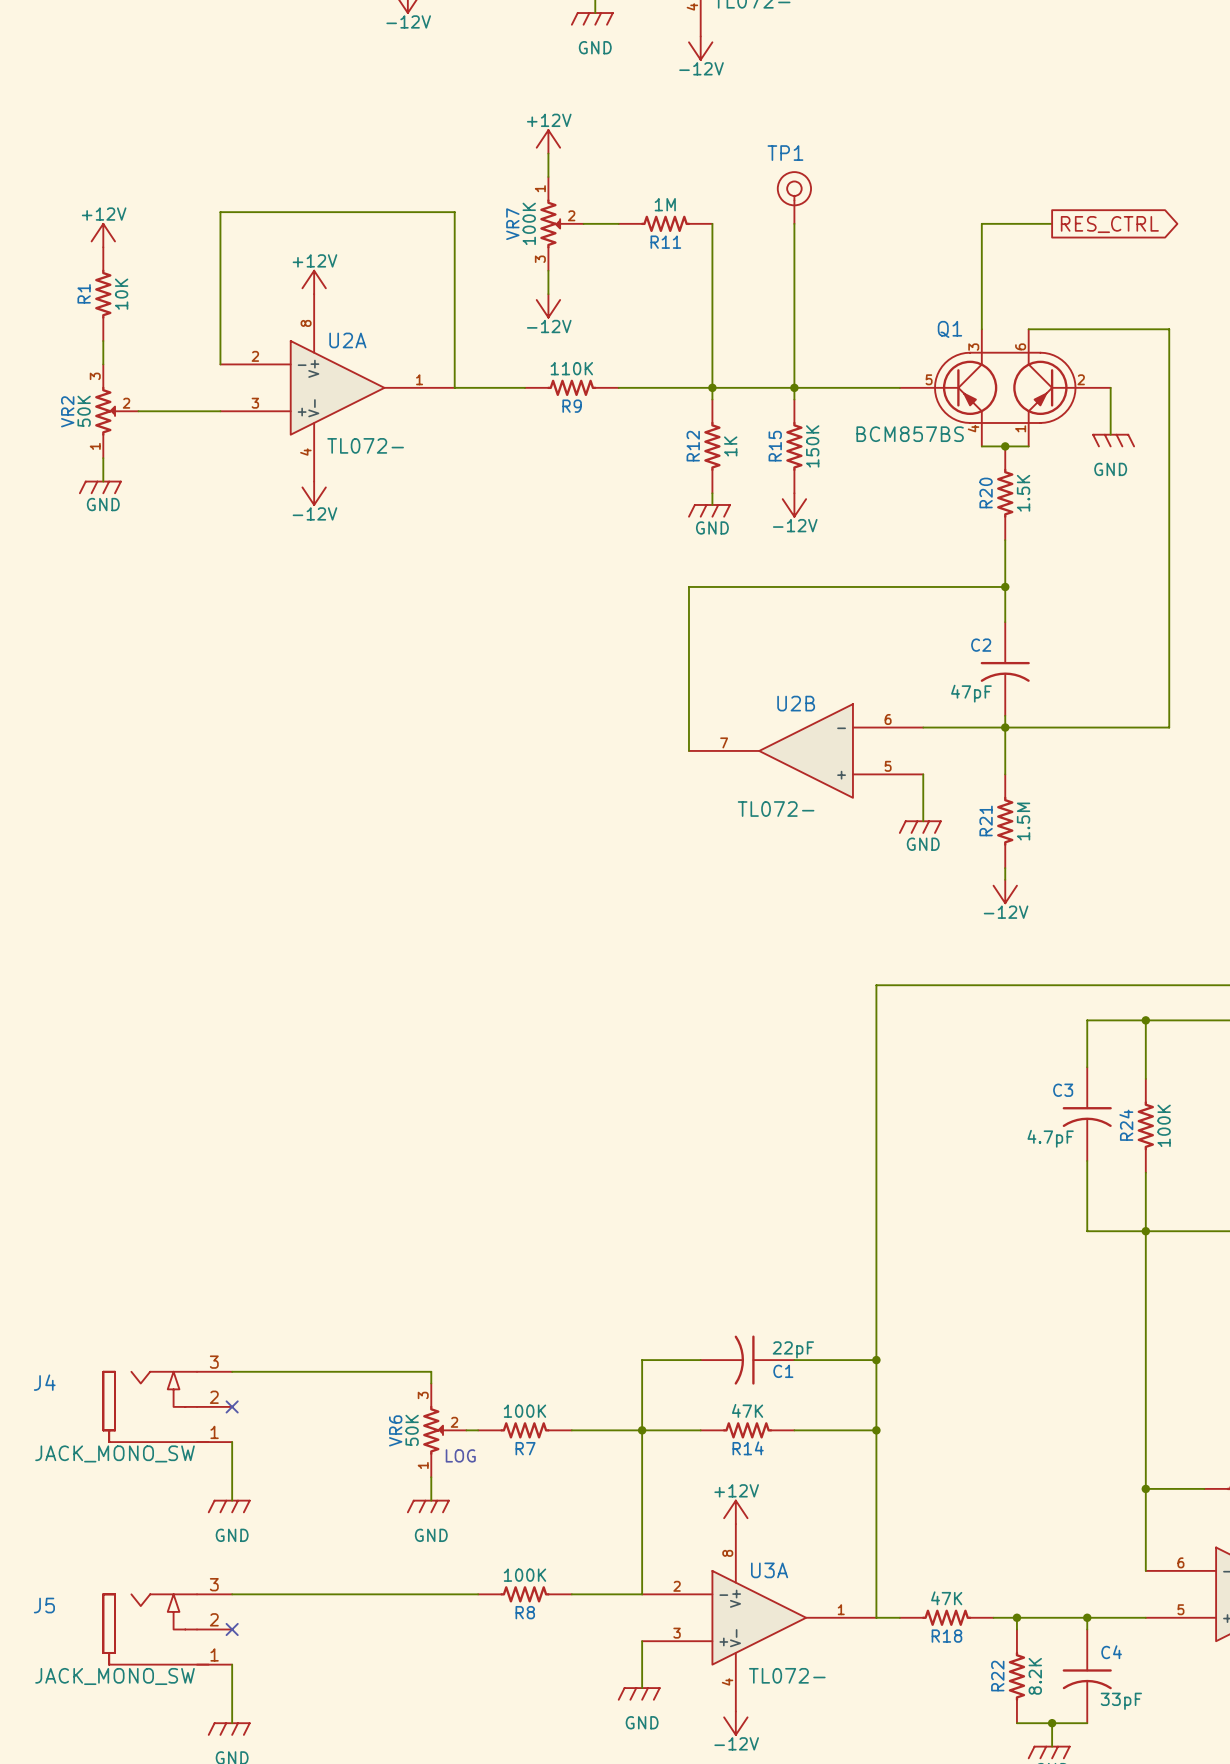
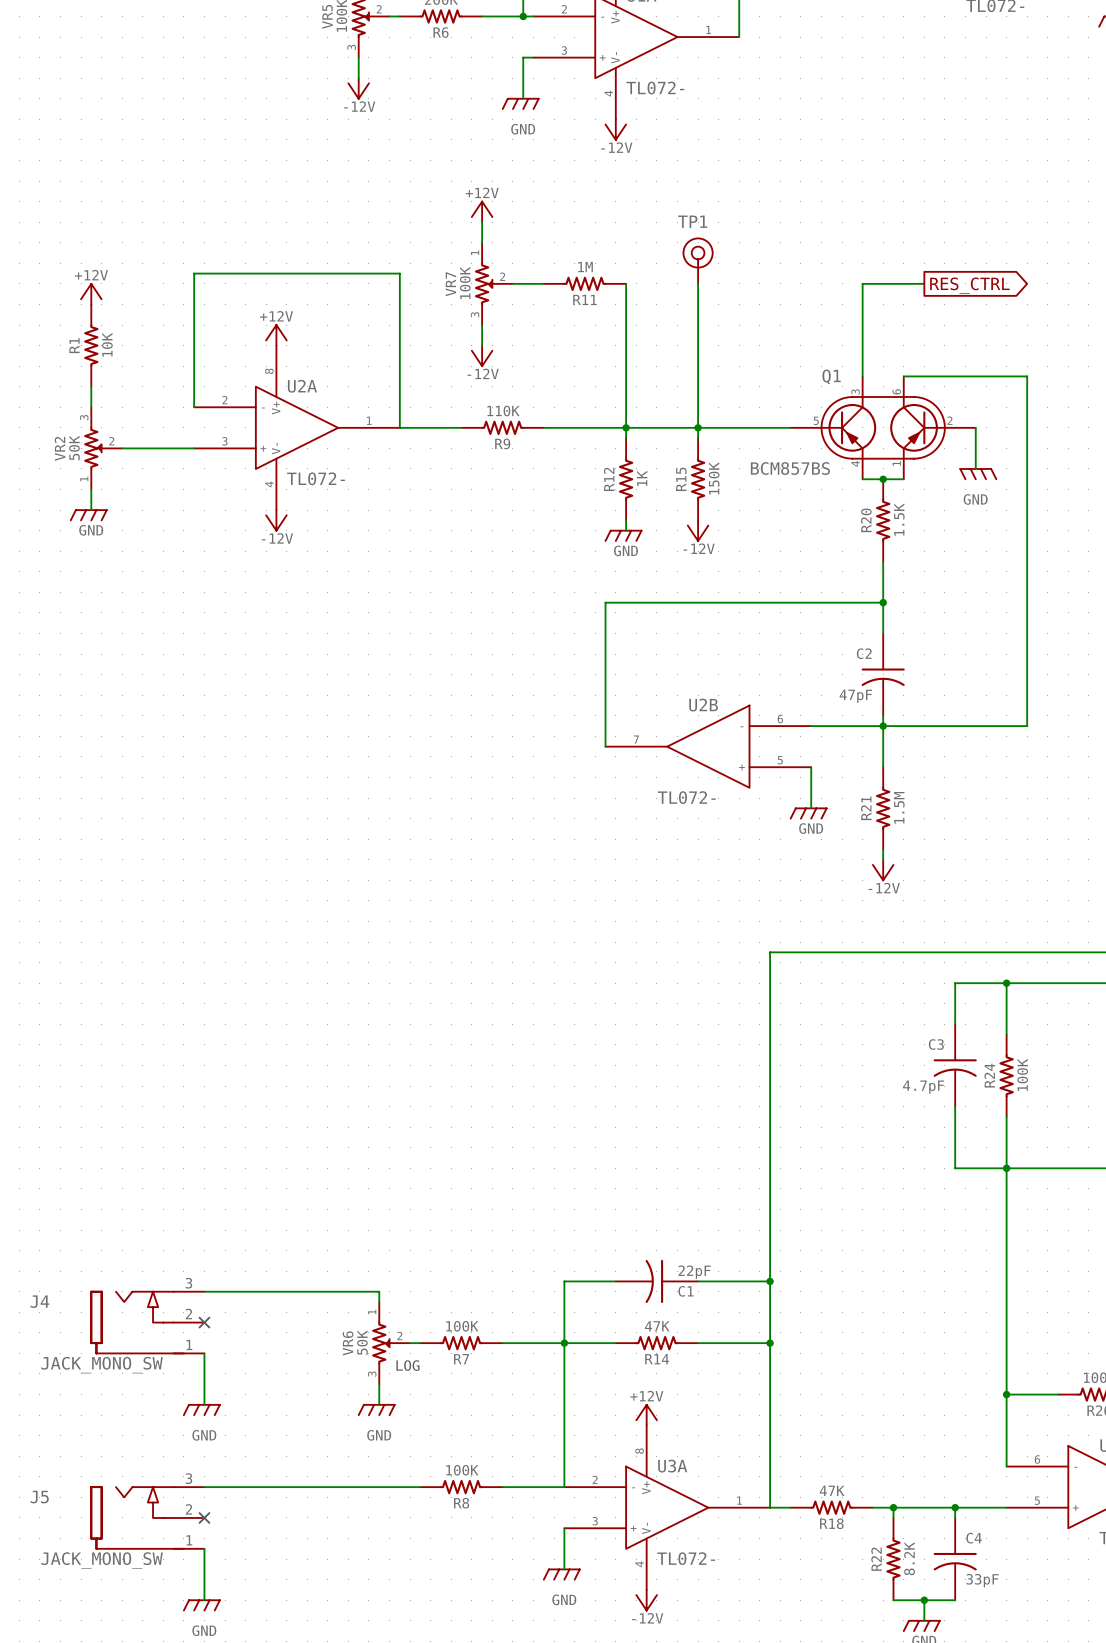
VR6 flip: as is (433, 1430) -> up-down (380, 1343)

